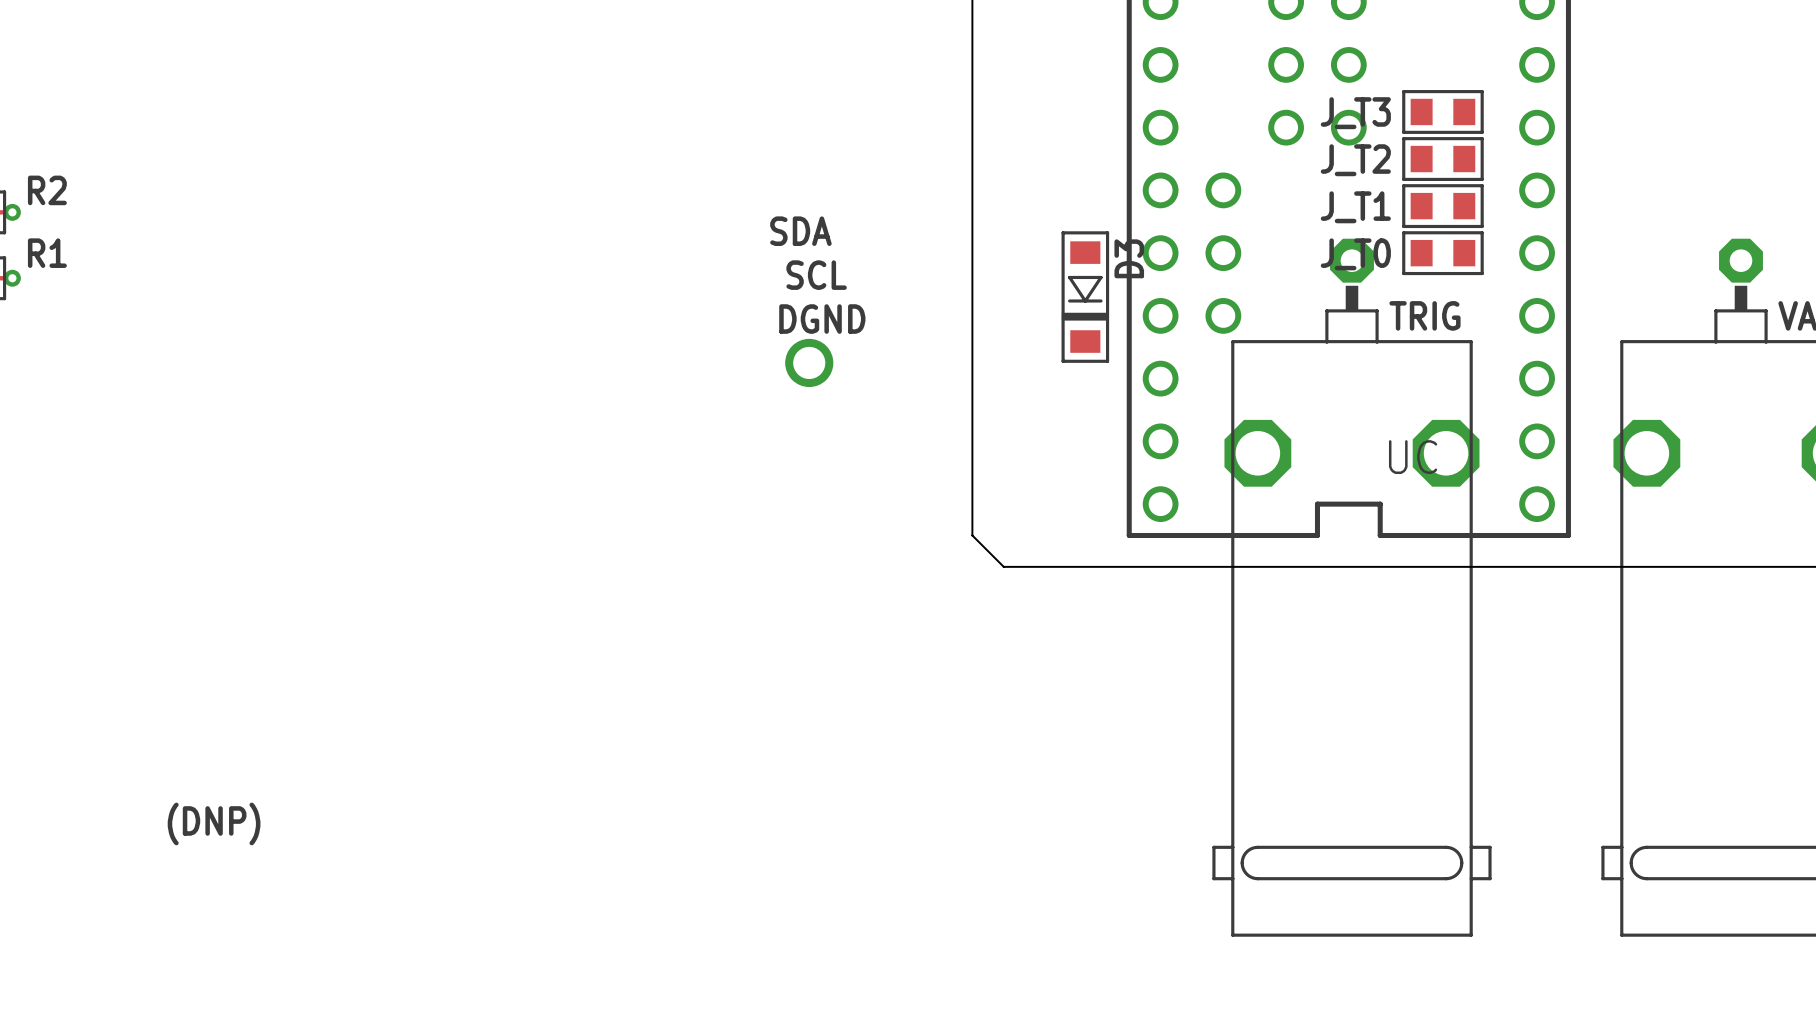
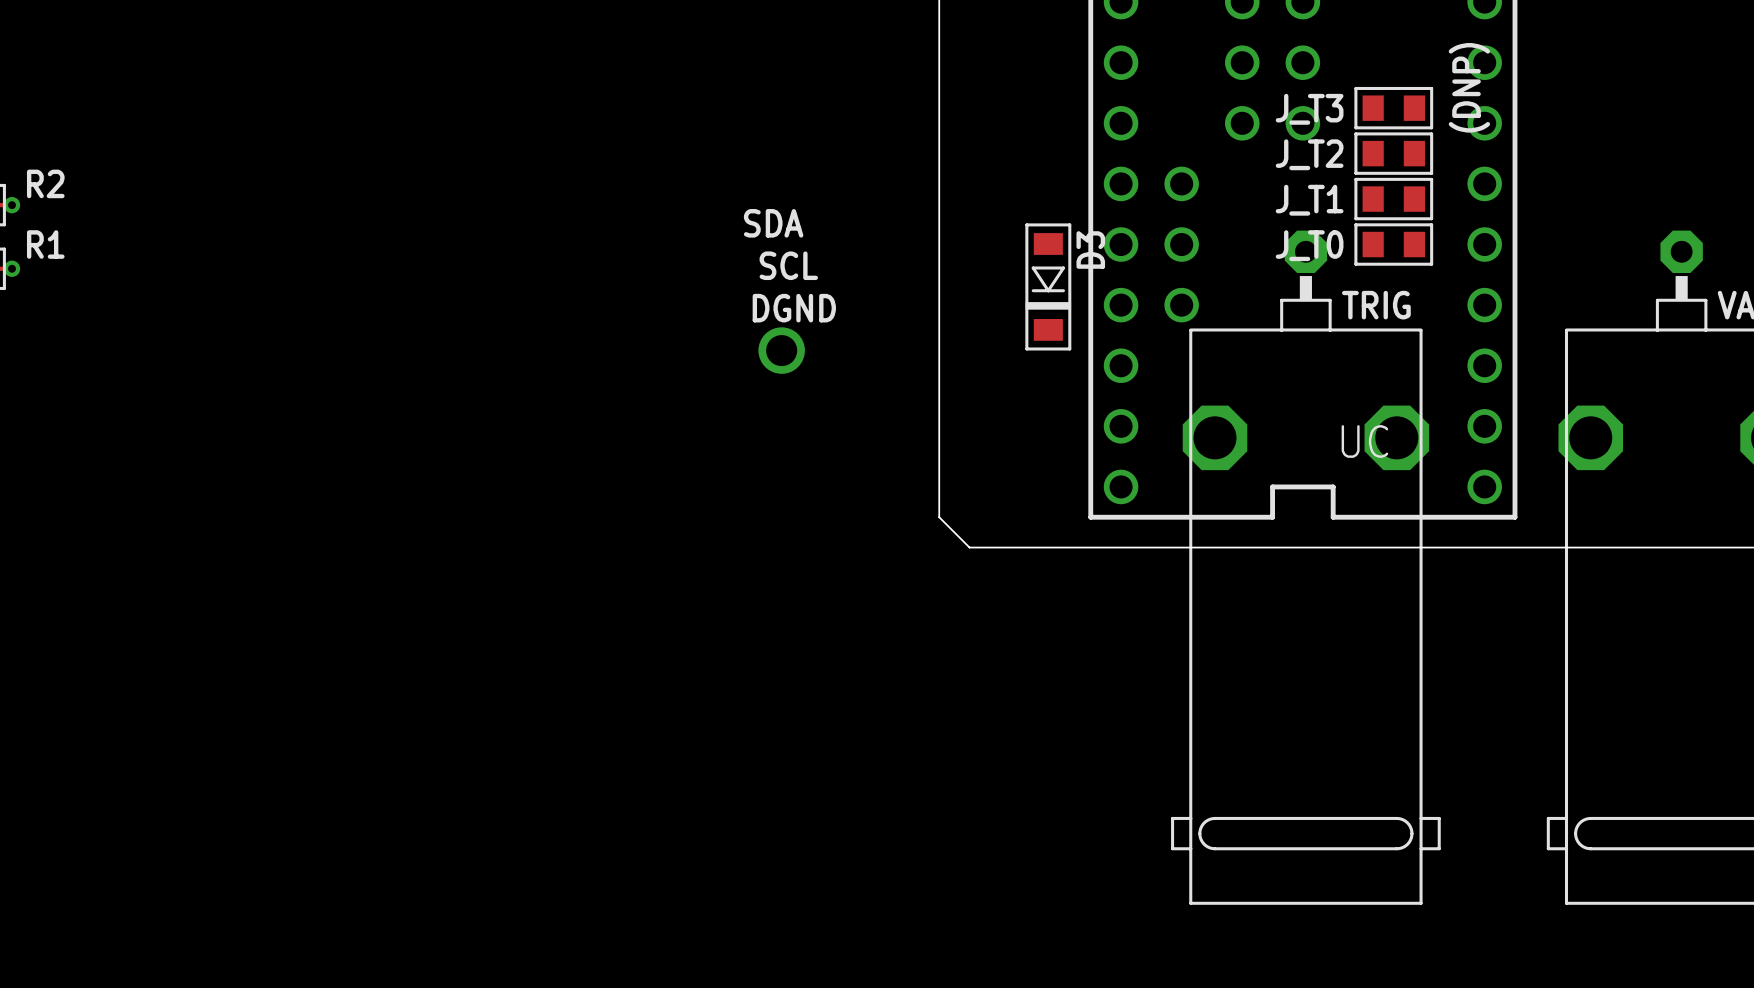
text: none -> (DNP) (1469, 87)
text: (DNP) (214, 823) -> none

